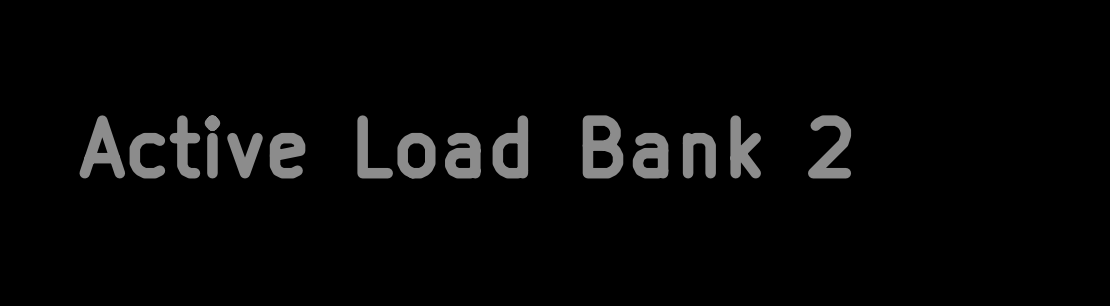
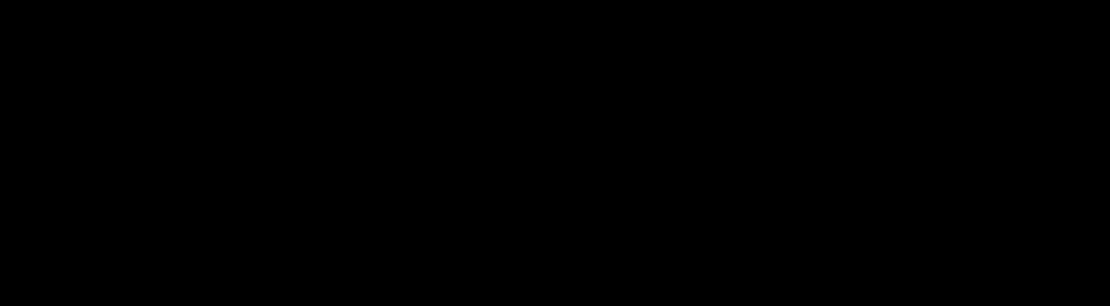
text: Active Load Bank 2 (465, 146) -> none

